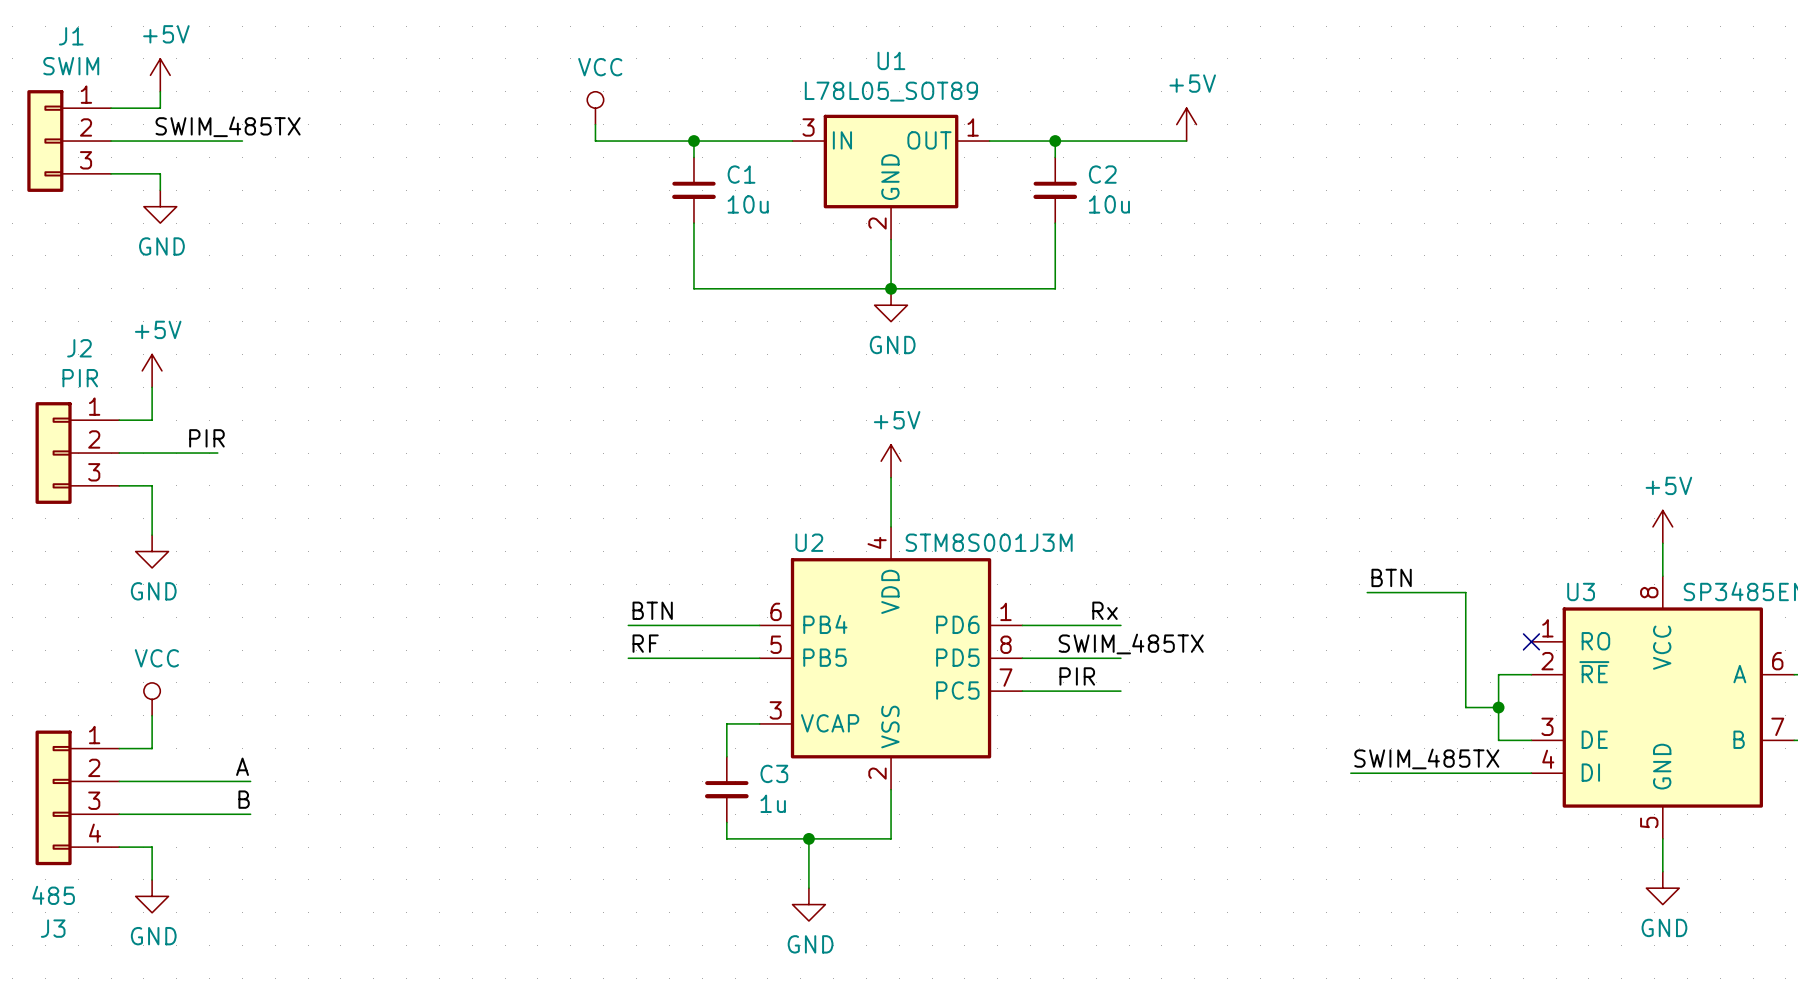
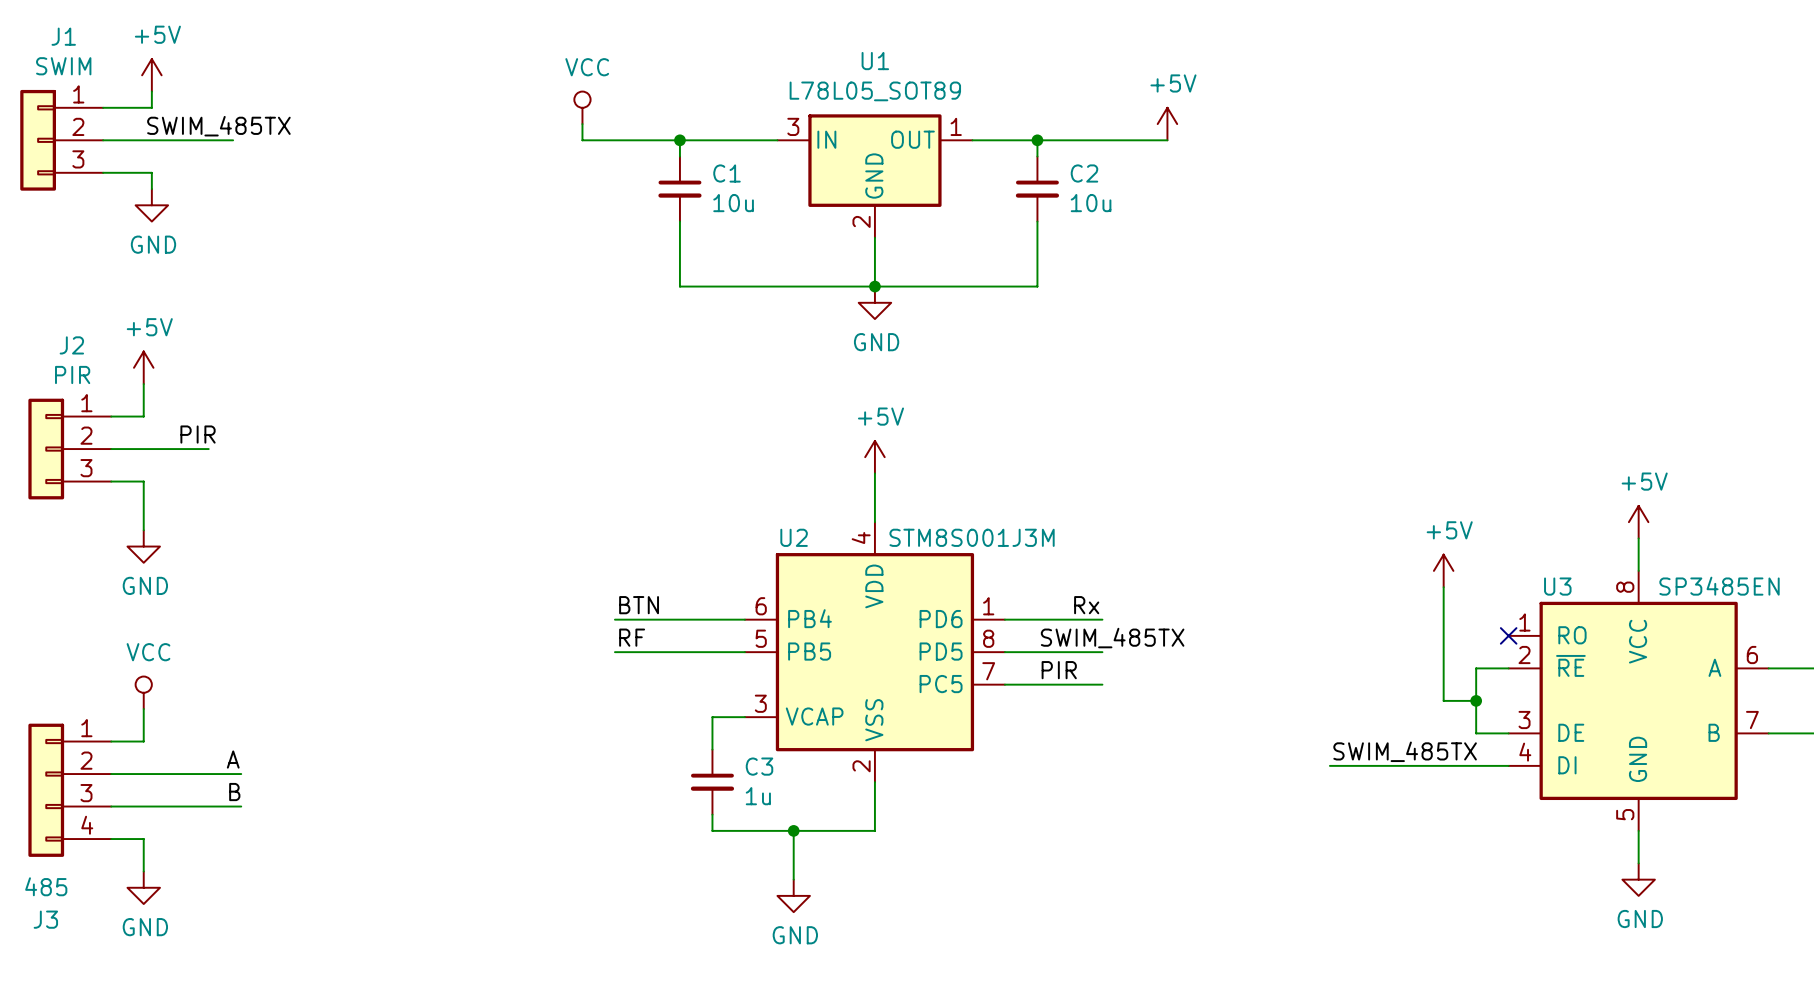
power symbol: none -> +5V (1443, 570)
label: BTN (1391, 577) -> none
wire: (1367, 592) (1465, 592) -> none

